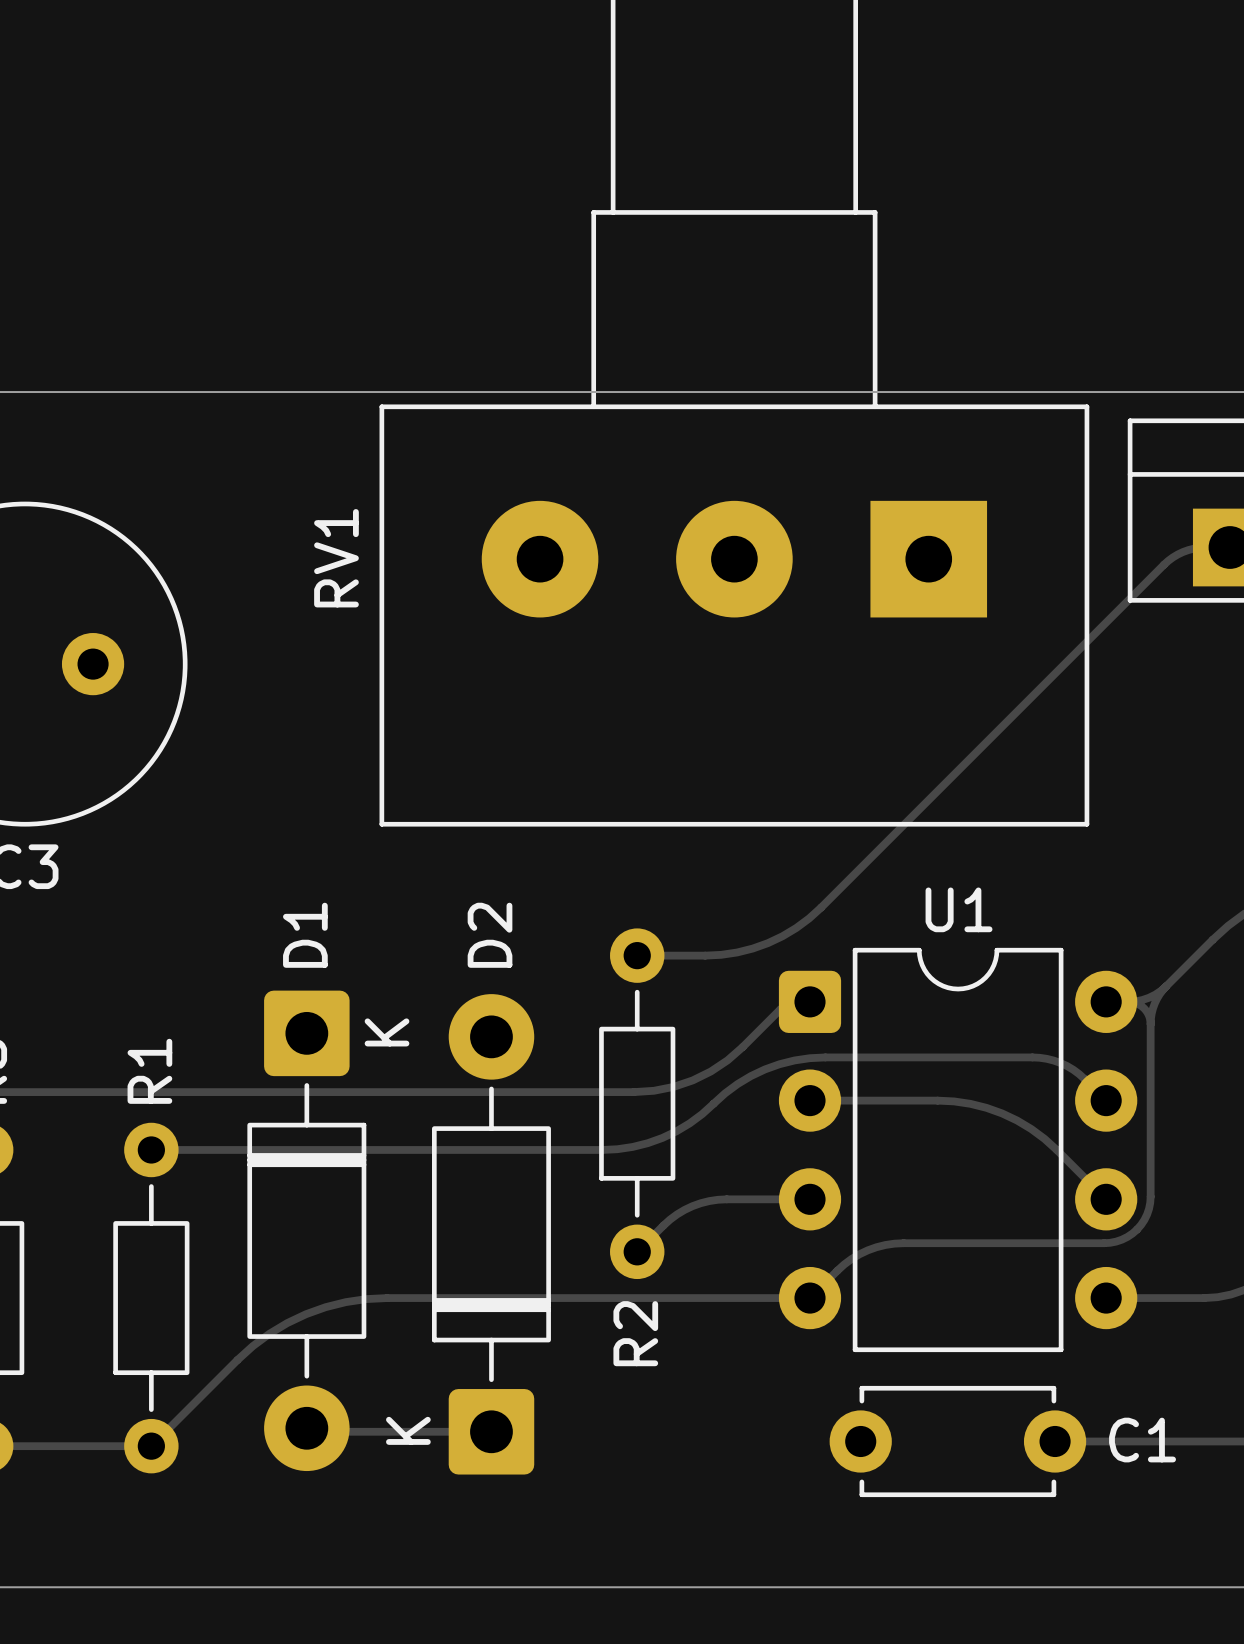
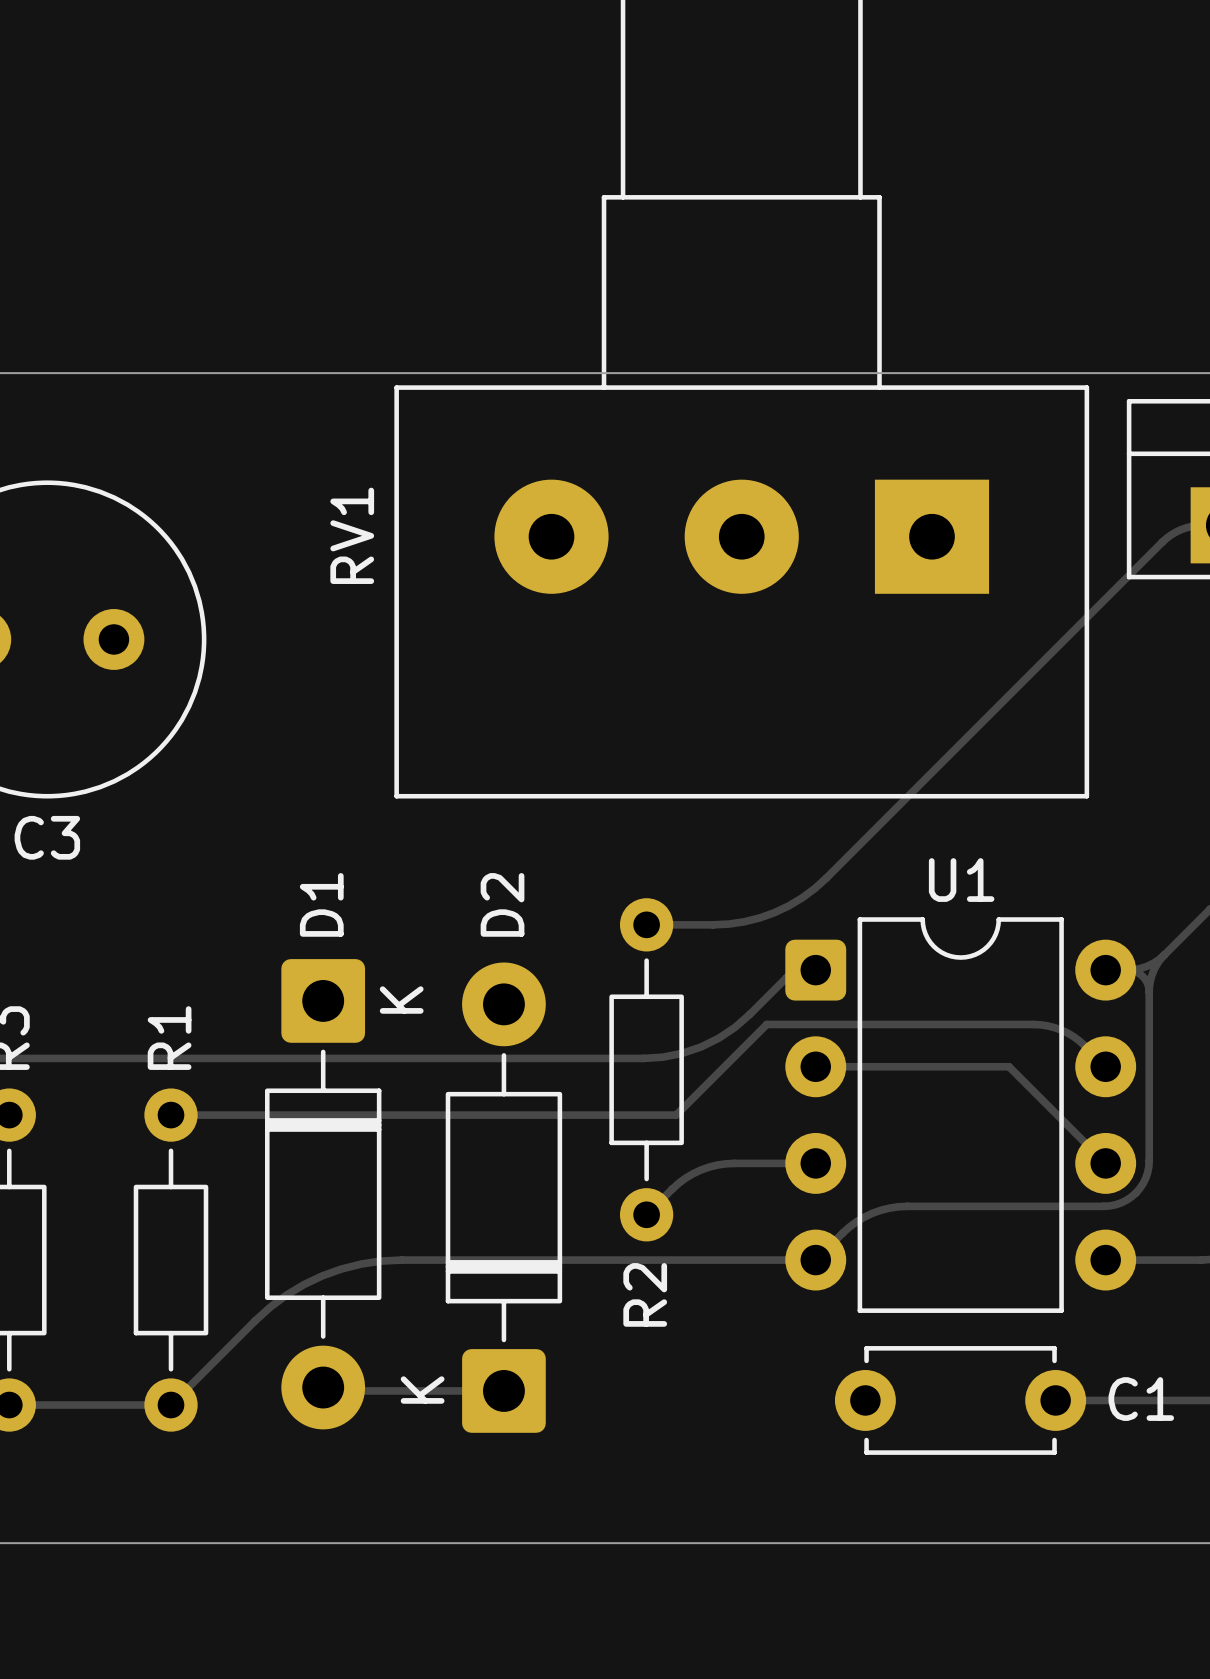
track: (825, 1057) (794, 1060) (764, 1069) (737, 1084) (702, 1114) (676, 1131) (647, 1143) (632, 1146) (601, 1149) -> (830, 1024) (766, 1024) (676, 1115) (612, 1115)
track: (937, 1100) (970, 1103) (1002, 1113) (1031, 1129) (1056, 1149) -> (940, 1066) (1009, 1066) (1057, 1115)

